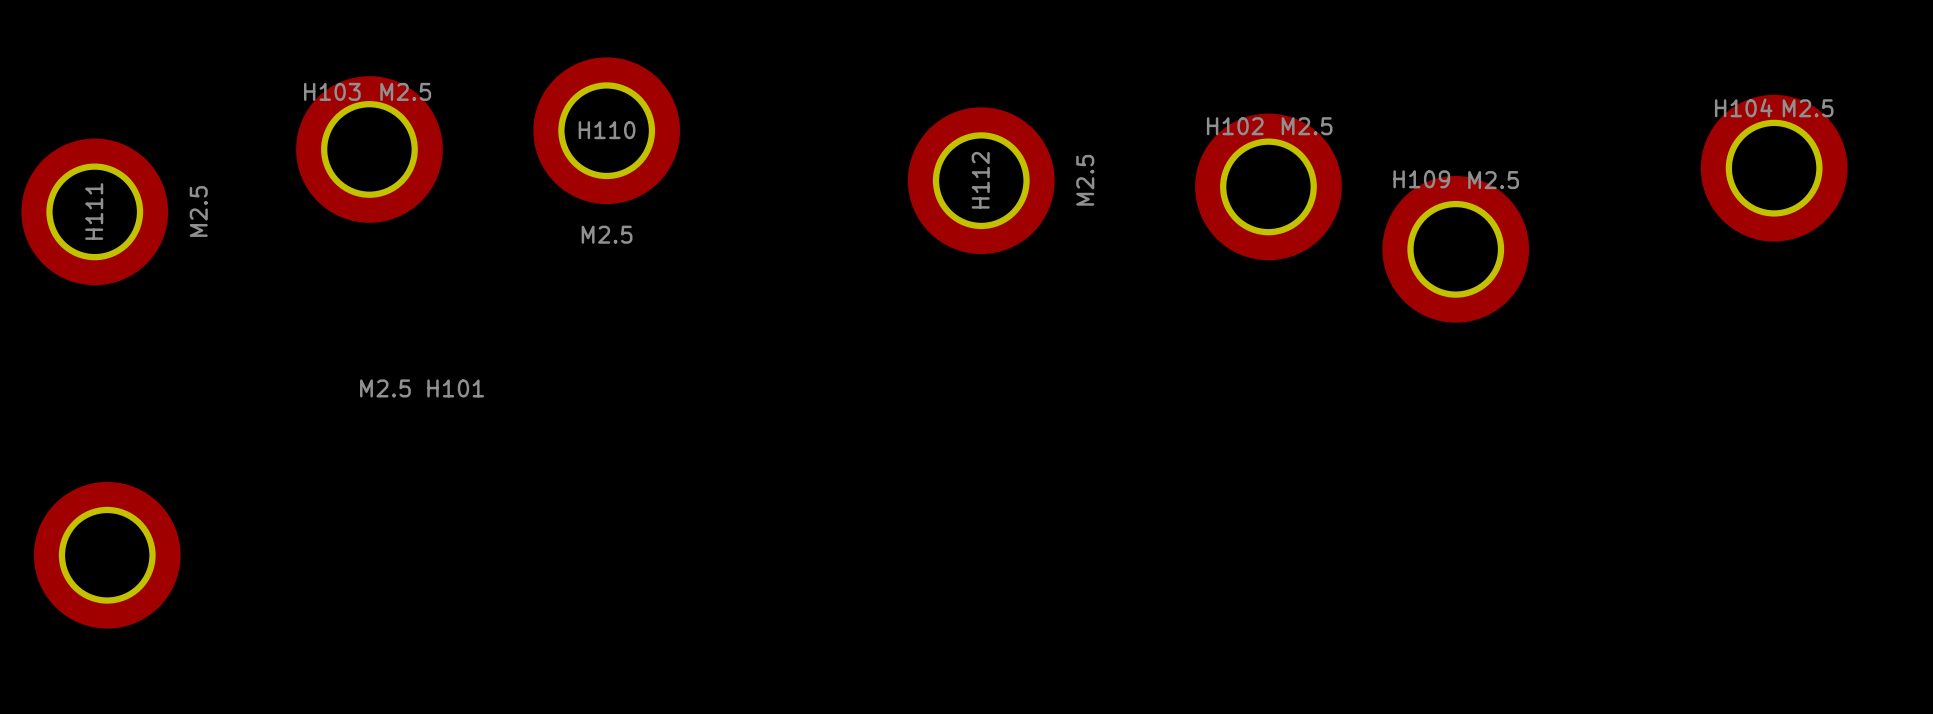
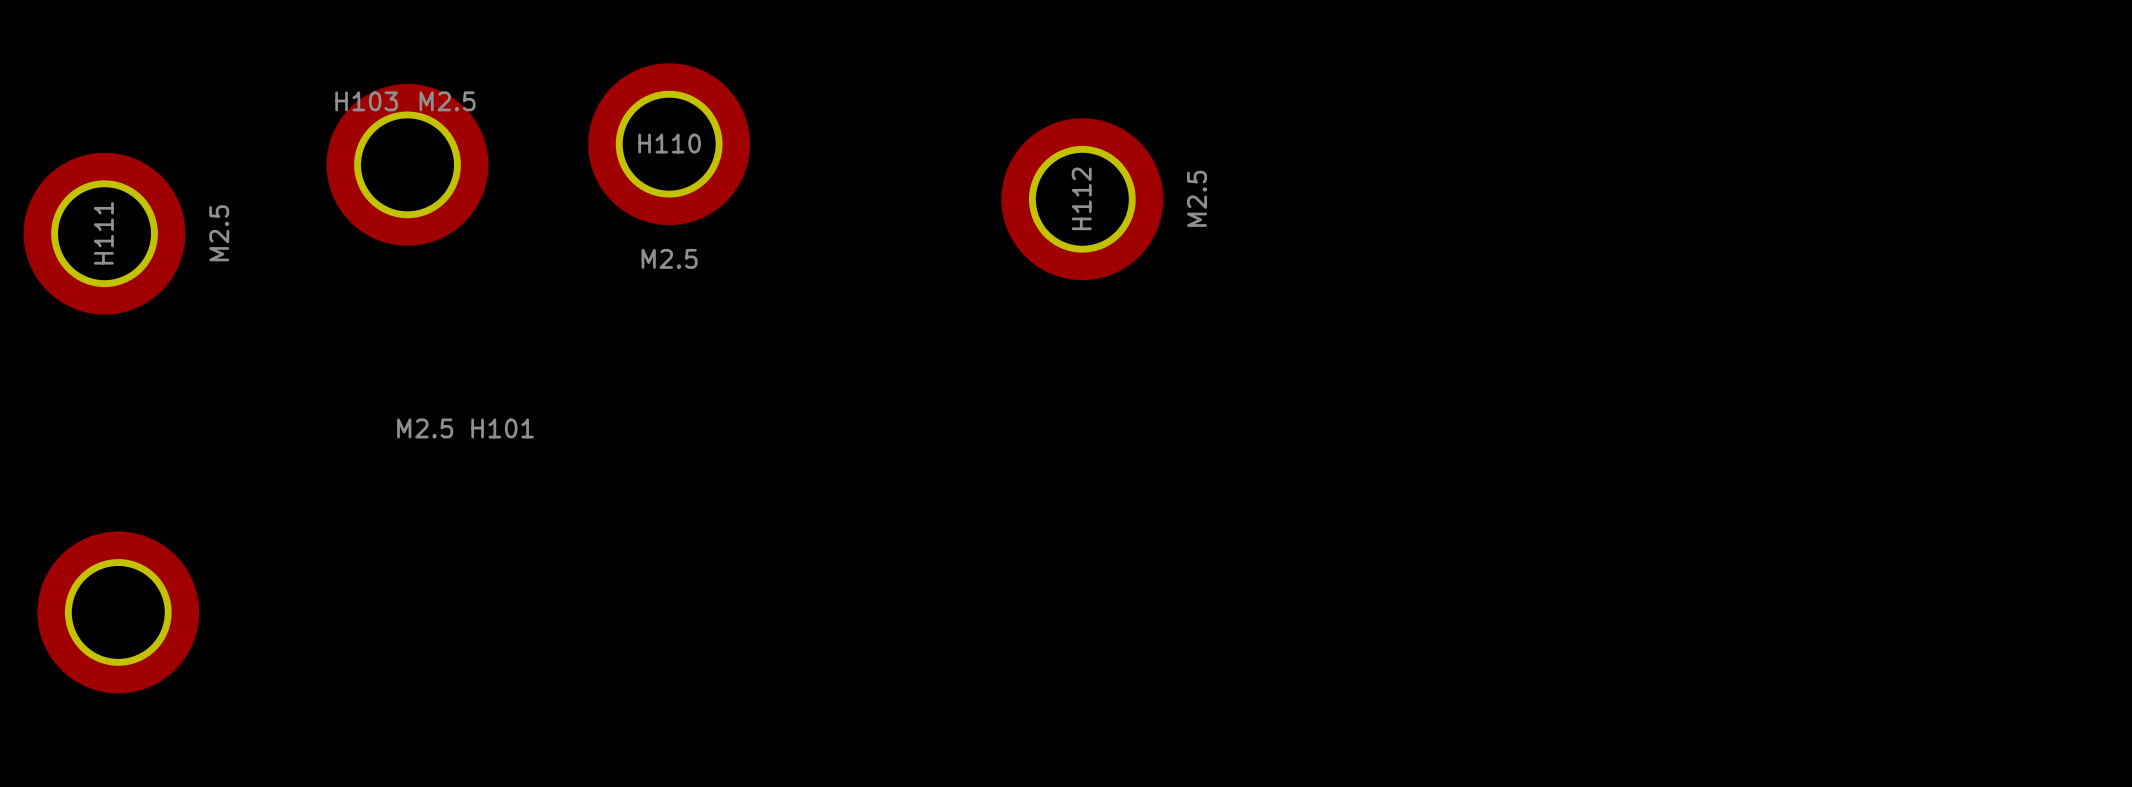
H104: M2.5 (1774, 168) -> none
H102: M2.5 (1268, 186) -> none
H109: M2.5 (1455, 249) -> none

